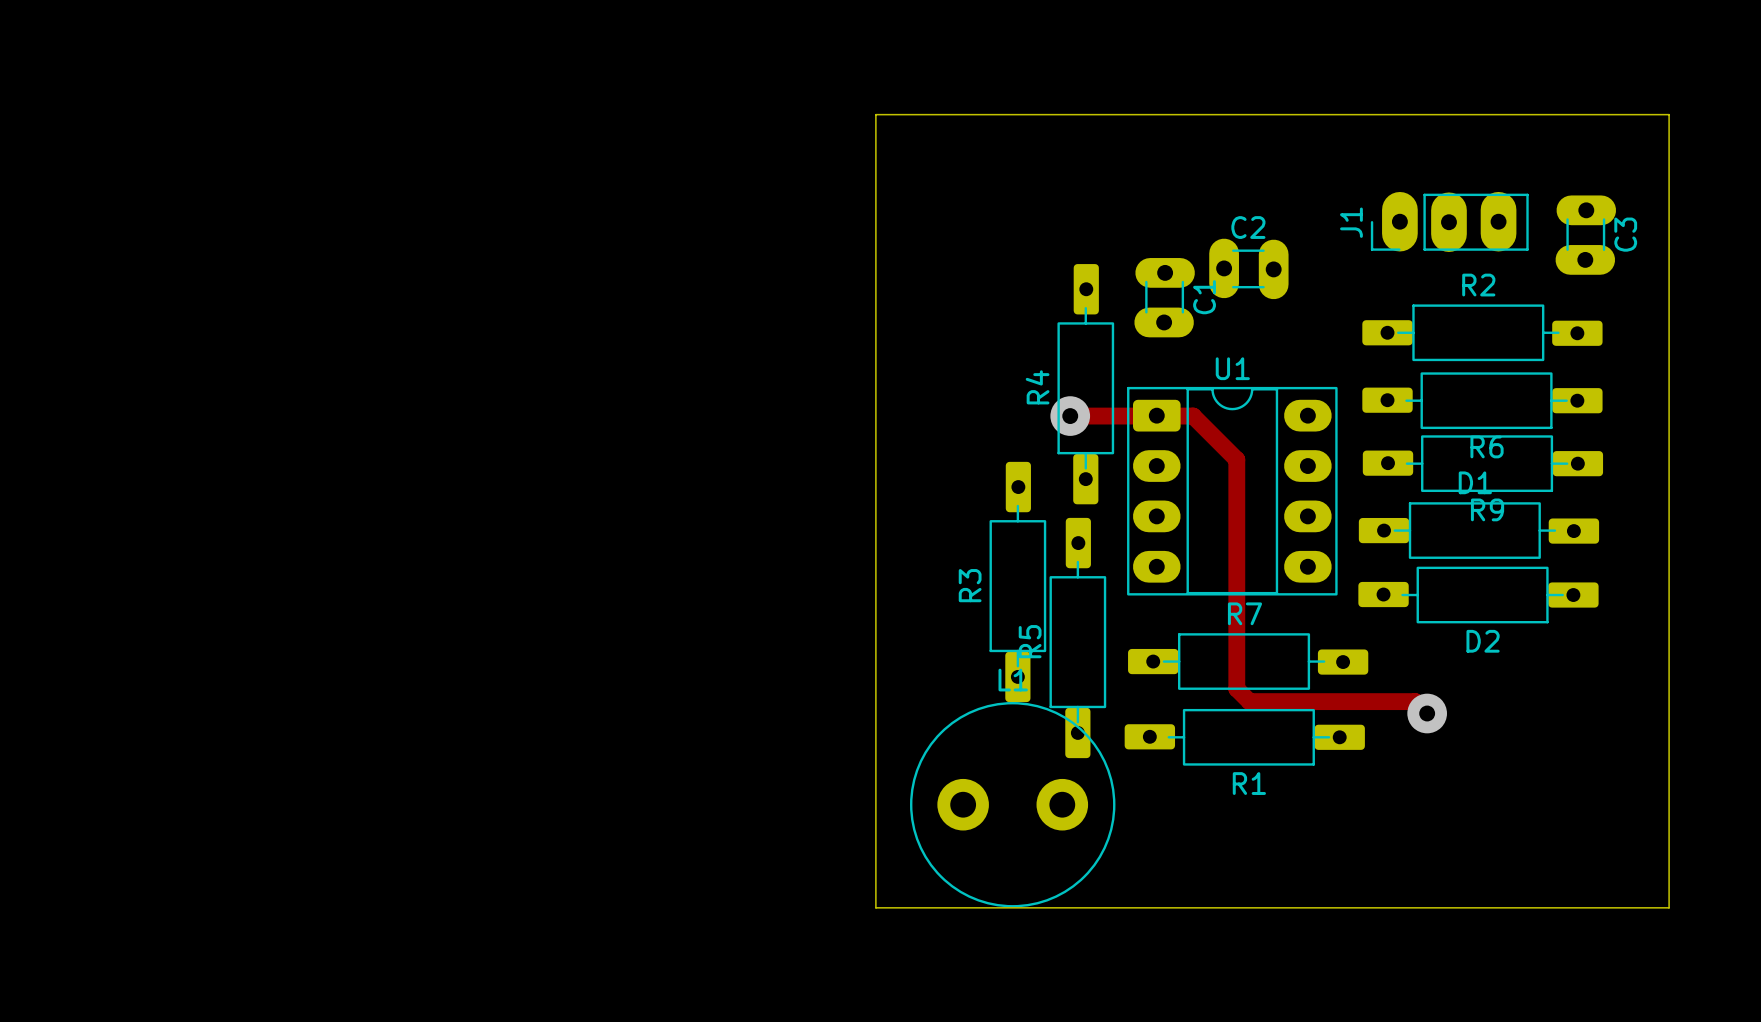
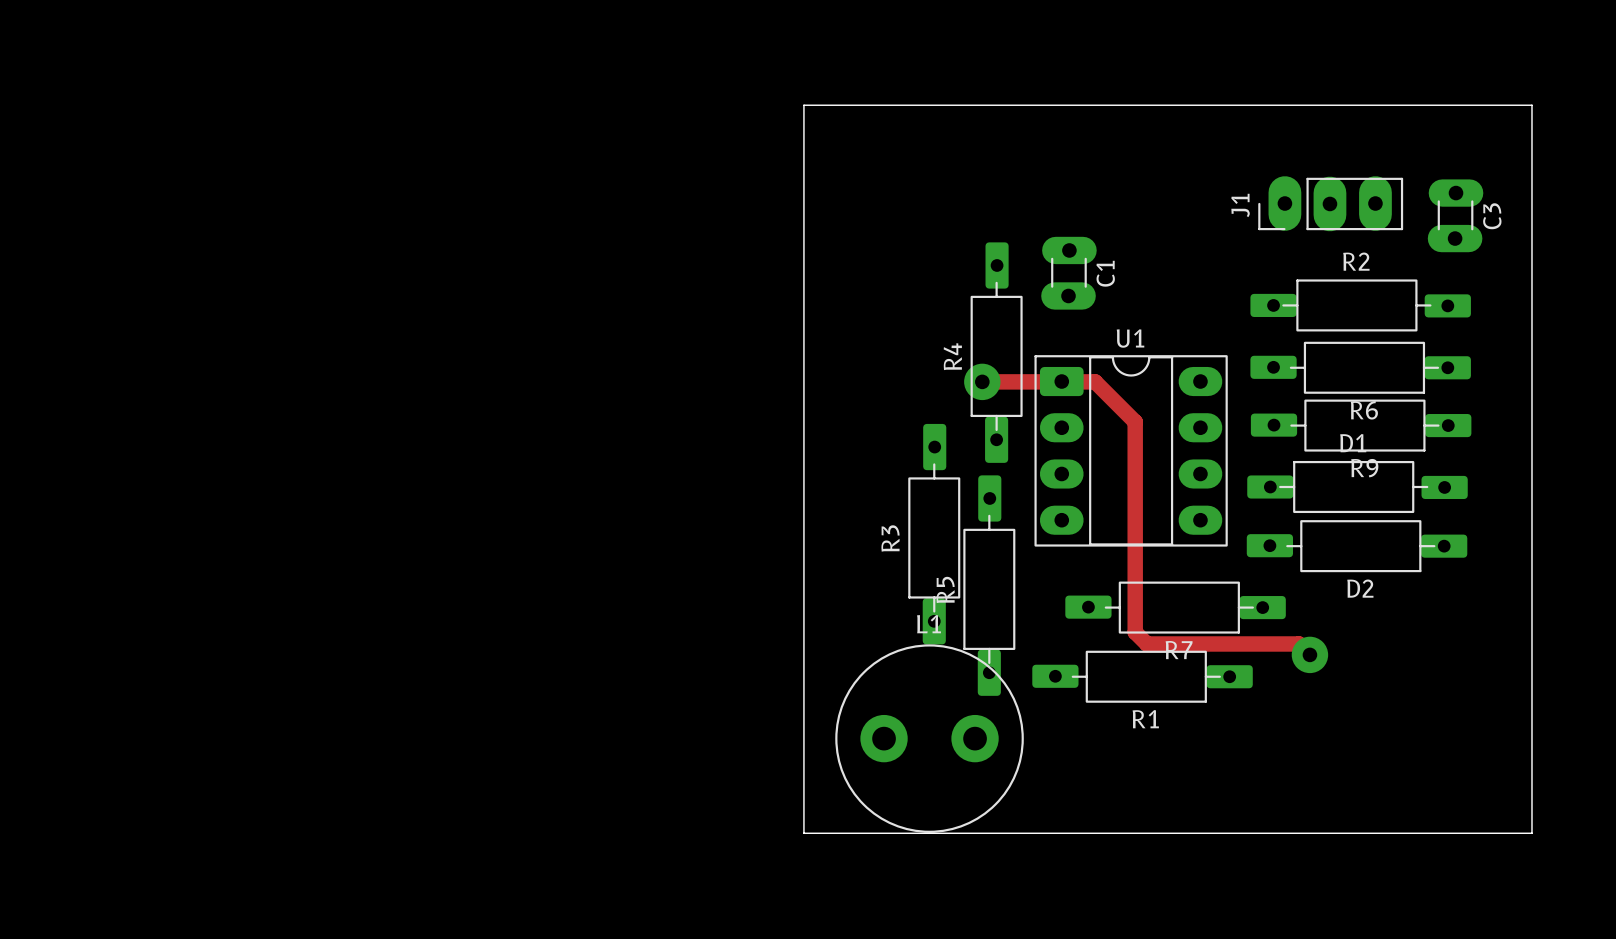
C2: (1248, 268) -> none
R7 rotation: 0° (1248, 661) -> 180° (1175, 607)

